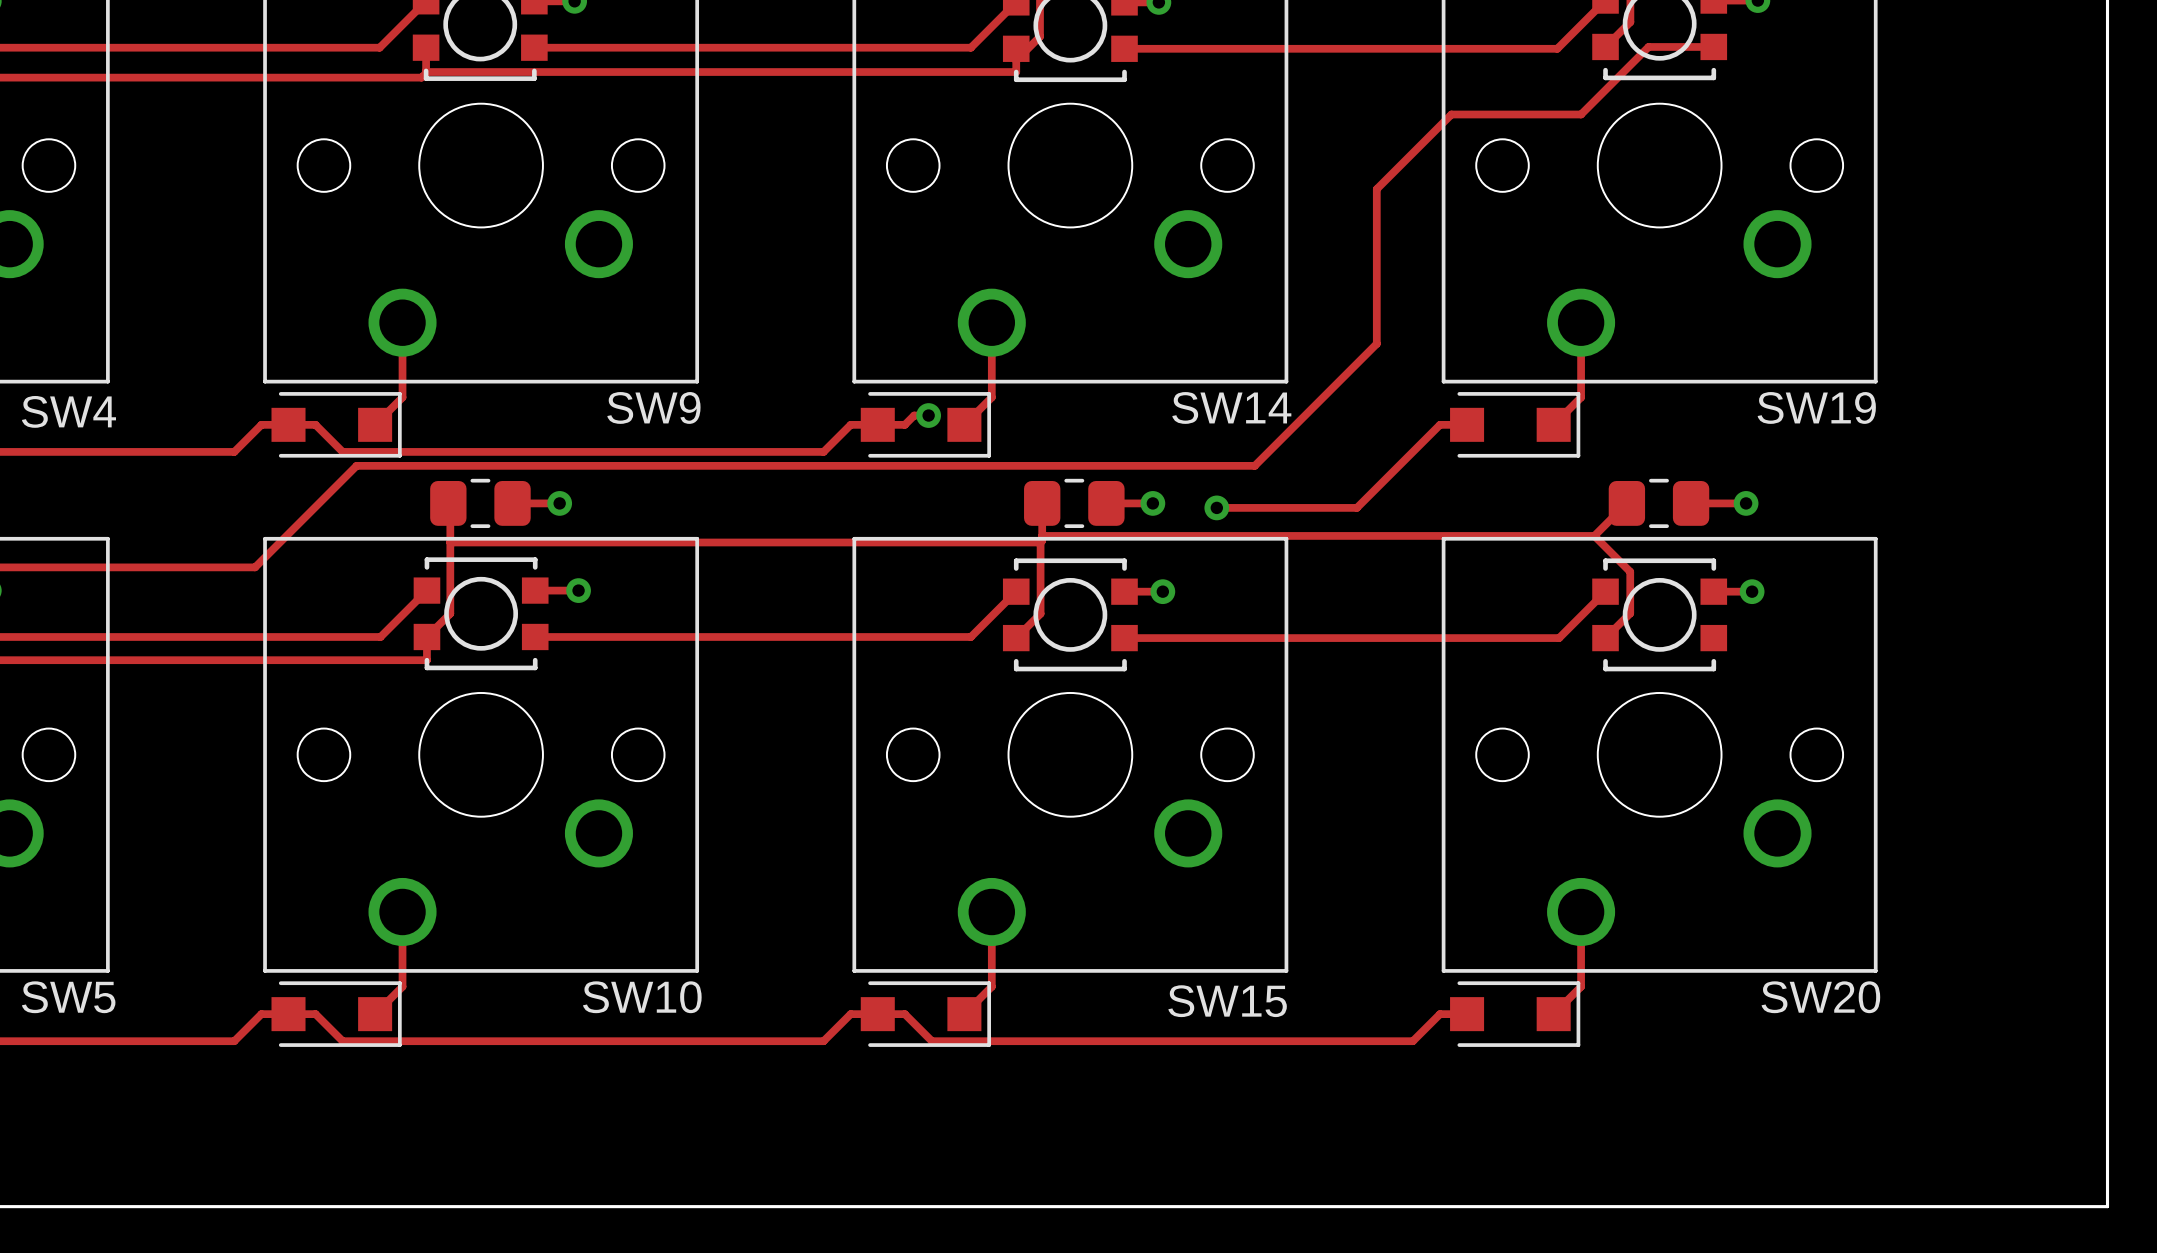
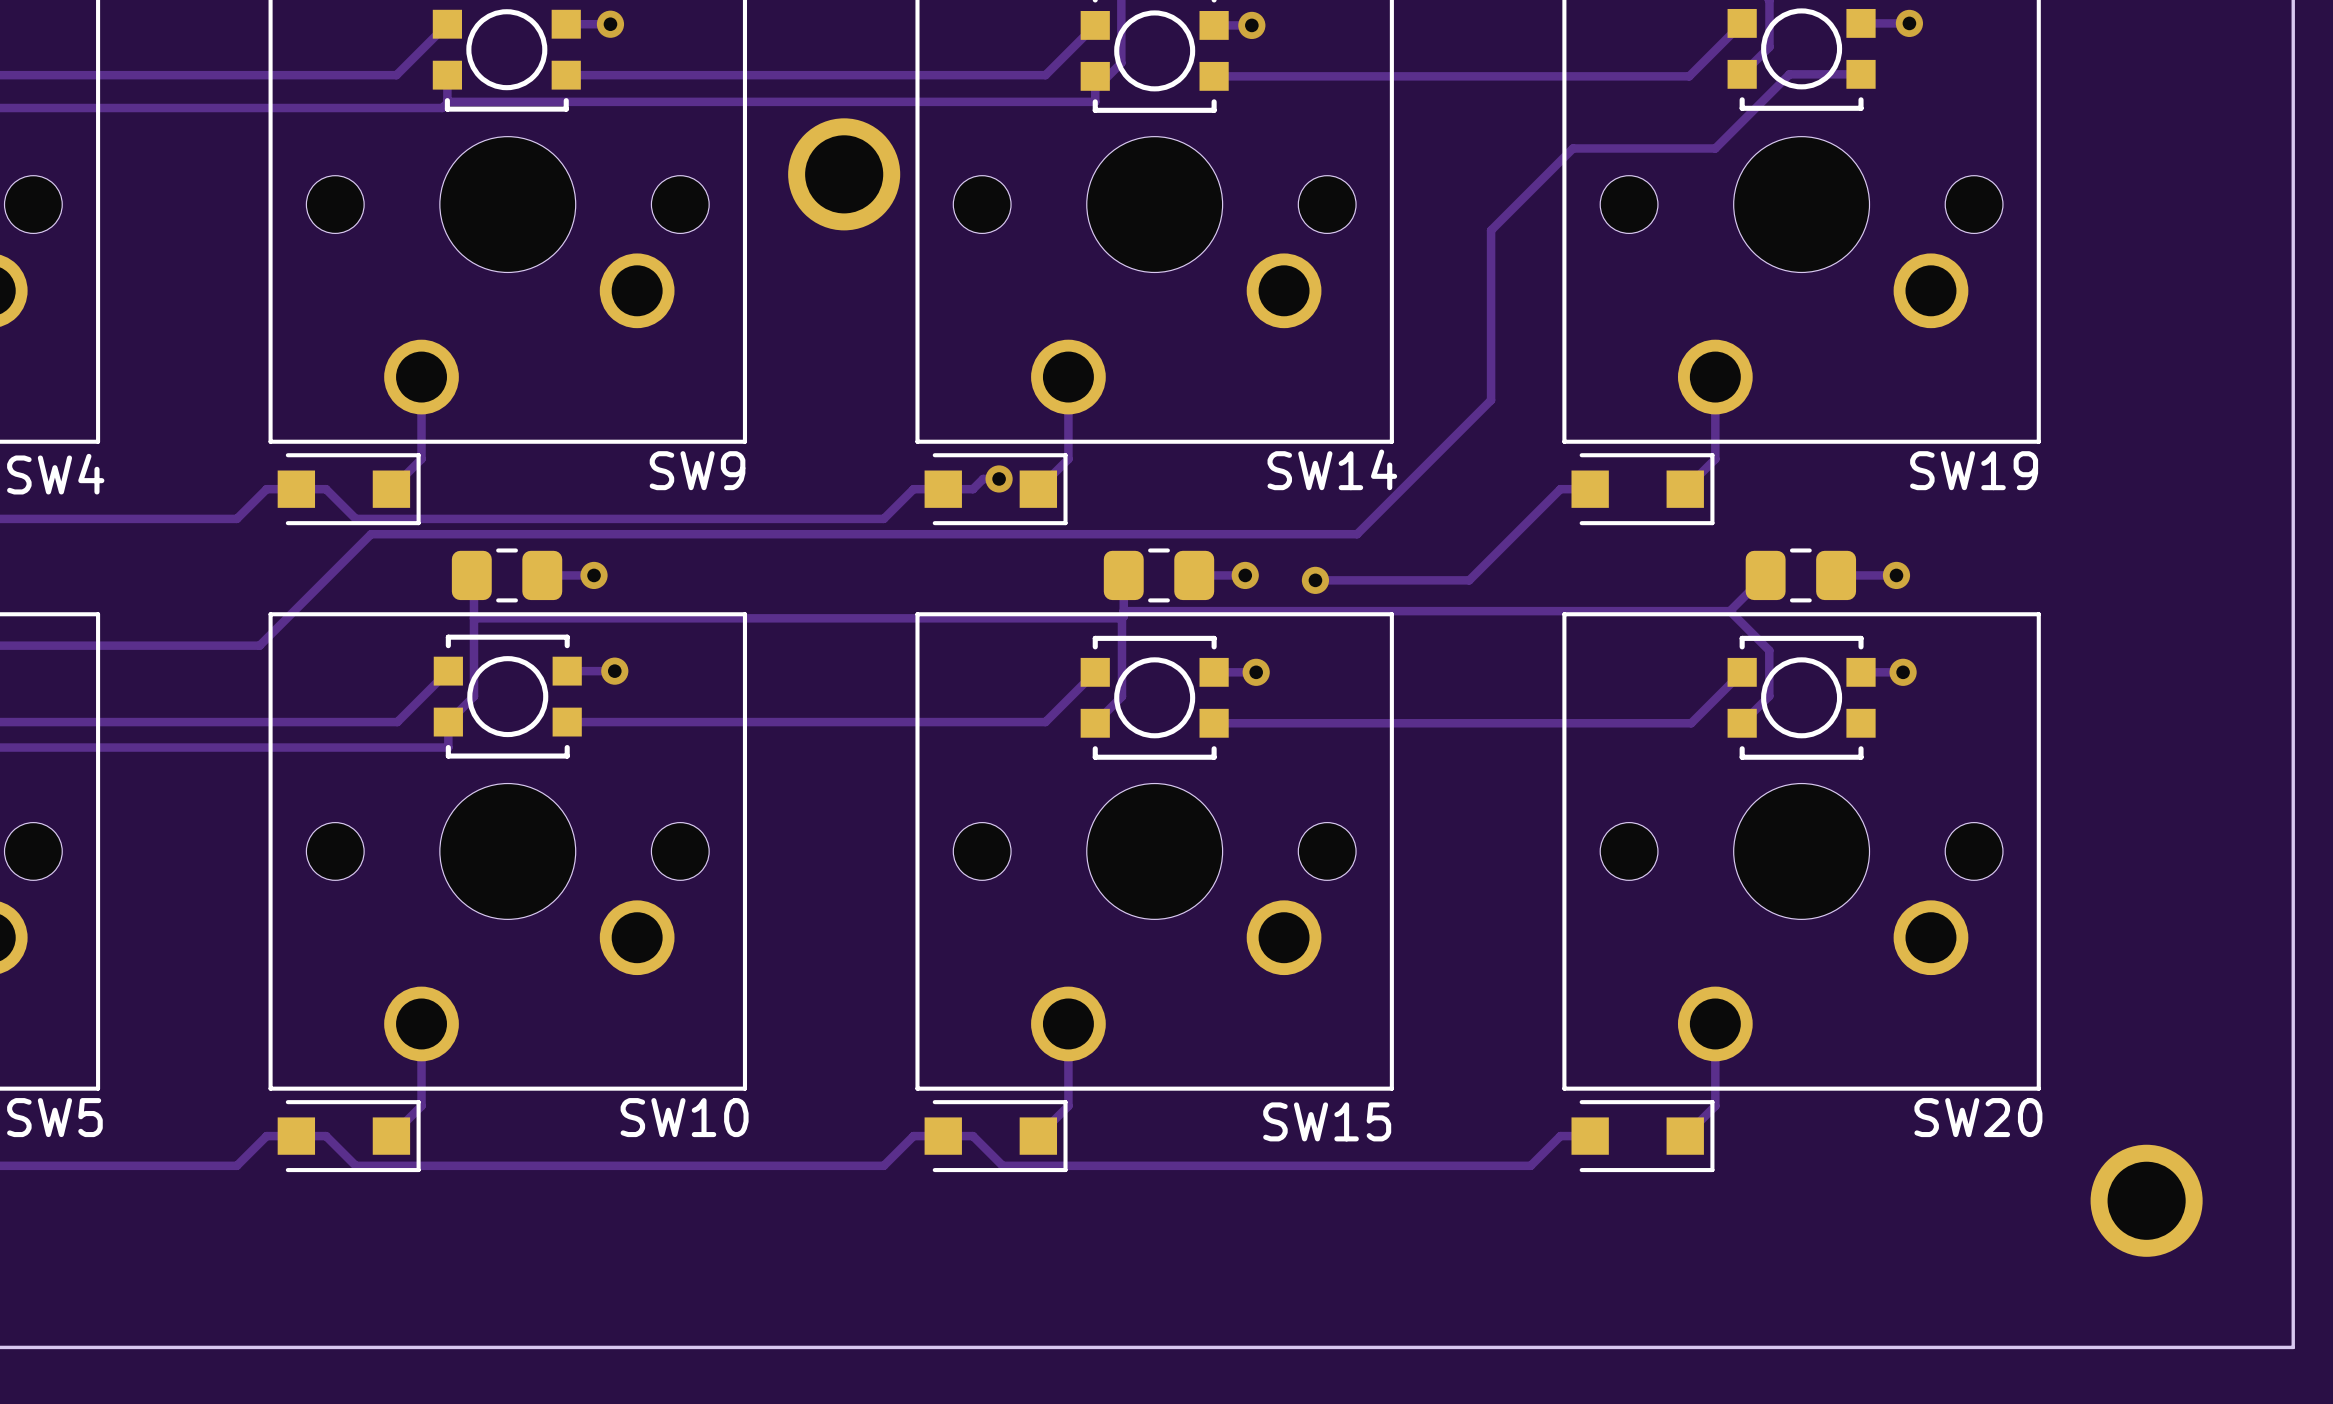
part: none -> (844, 174)
part: none -> (2146, 1200)

